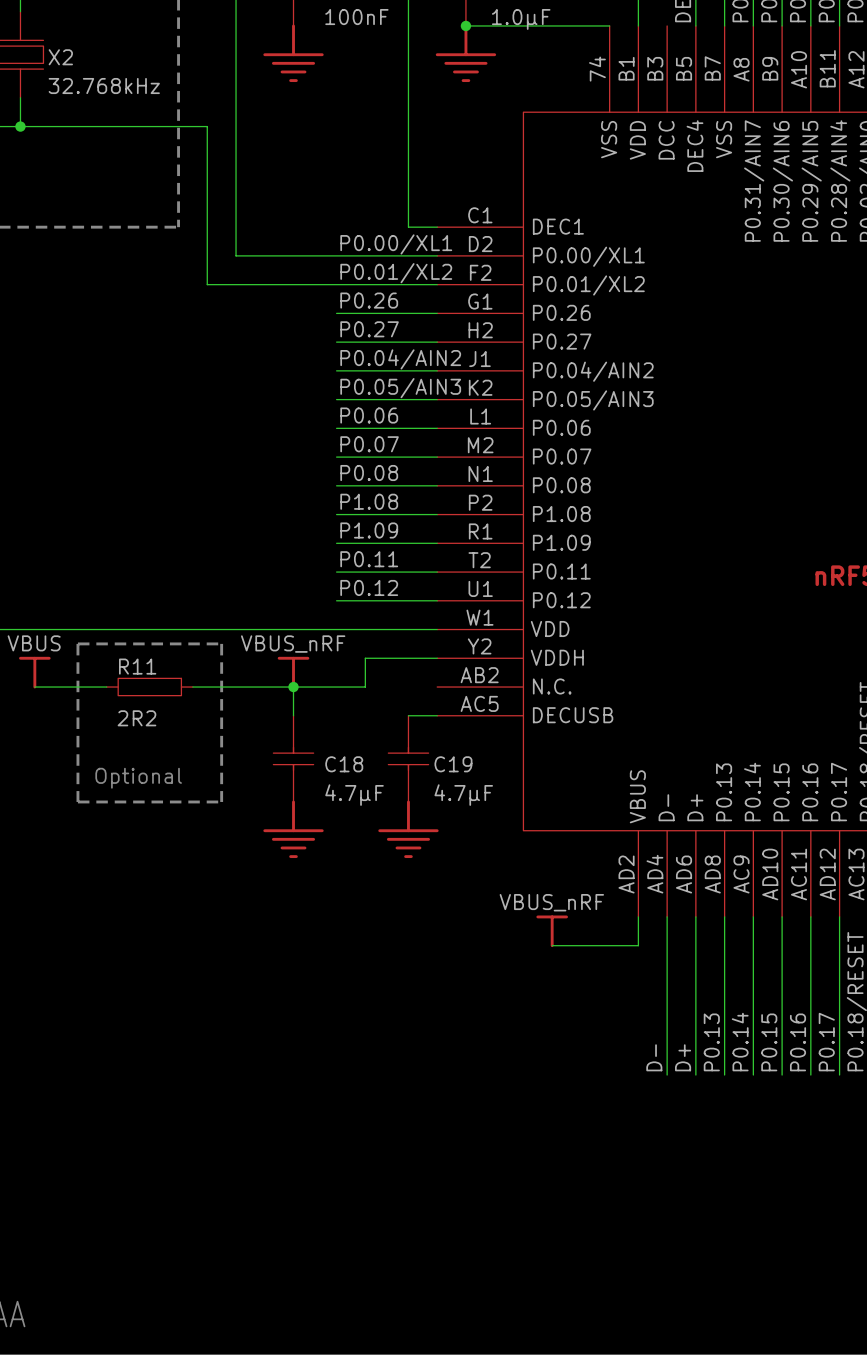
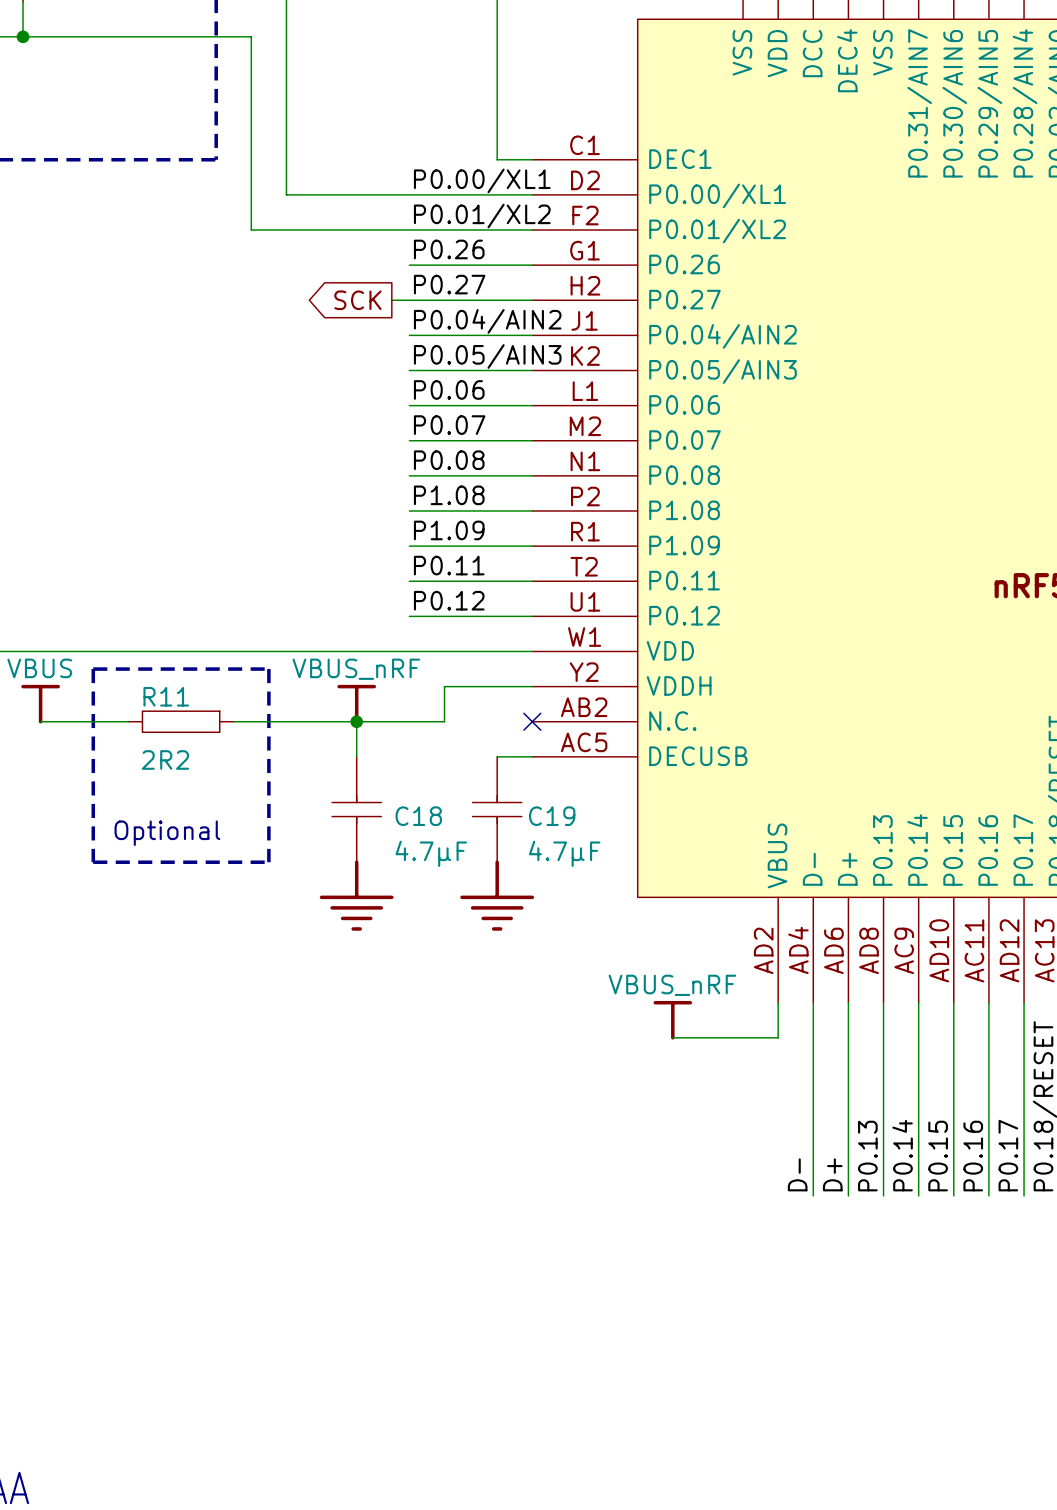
global label: none -> SCK (357, 300)
wire: none -> (391, 300) (409, 300)
no-connect mark: none -> (532, 721)

